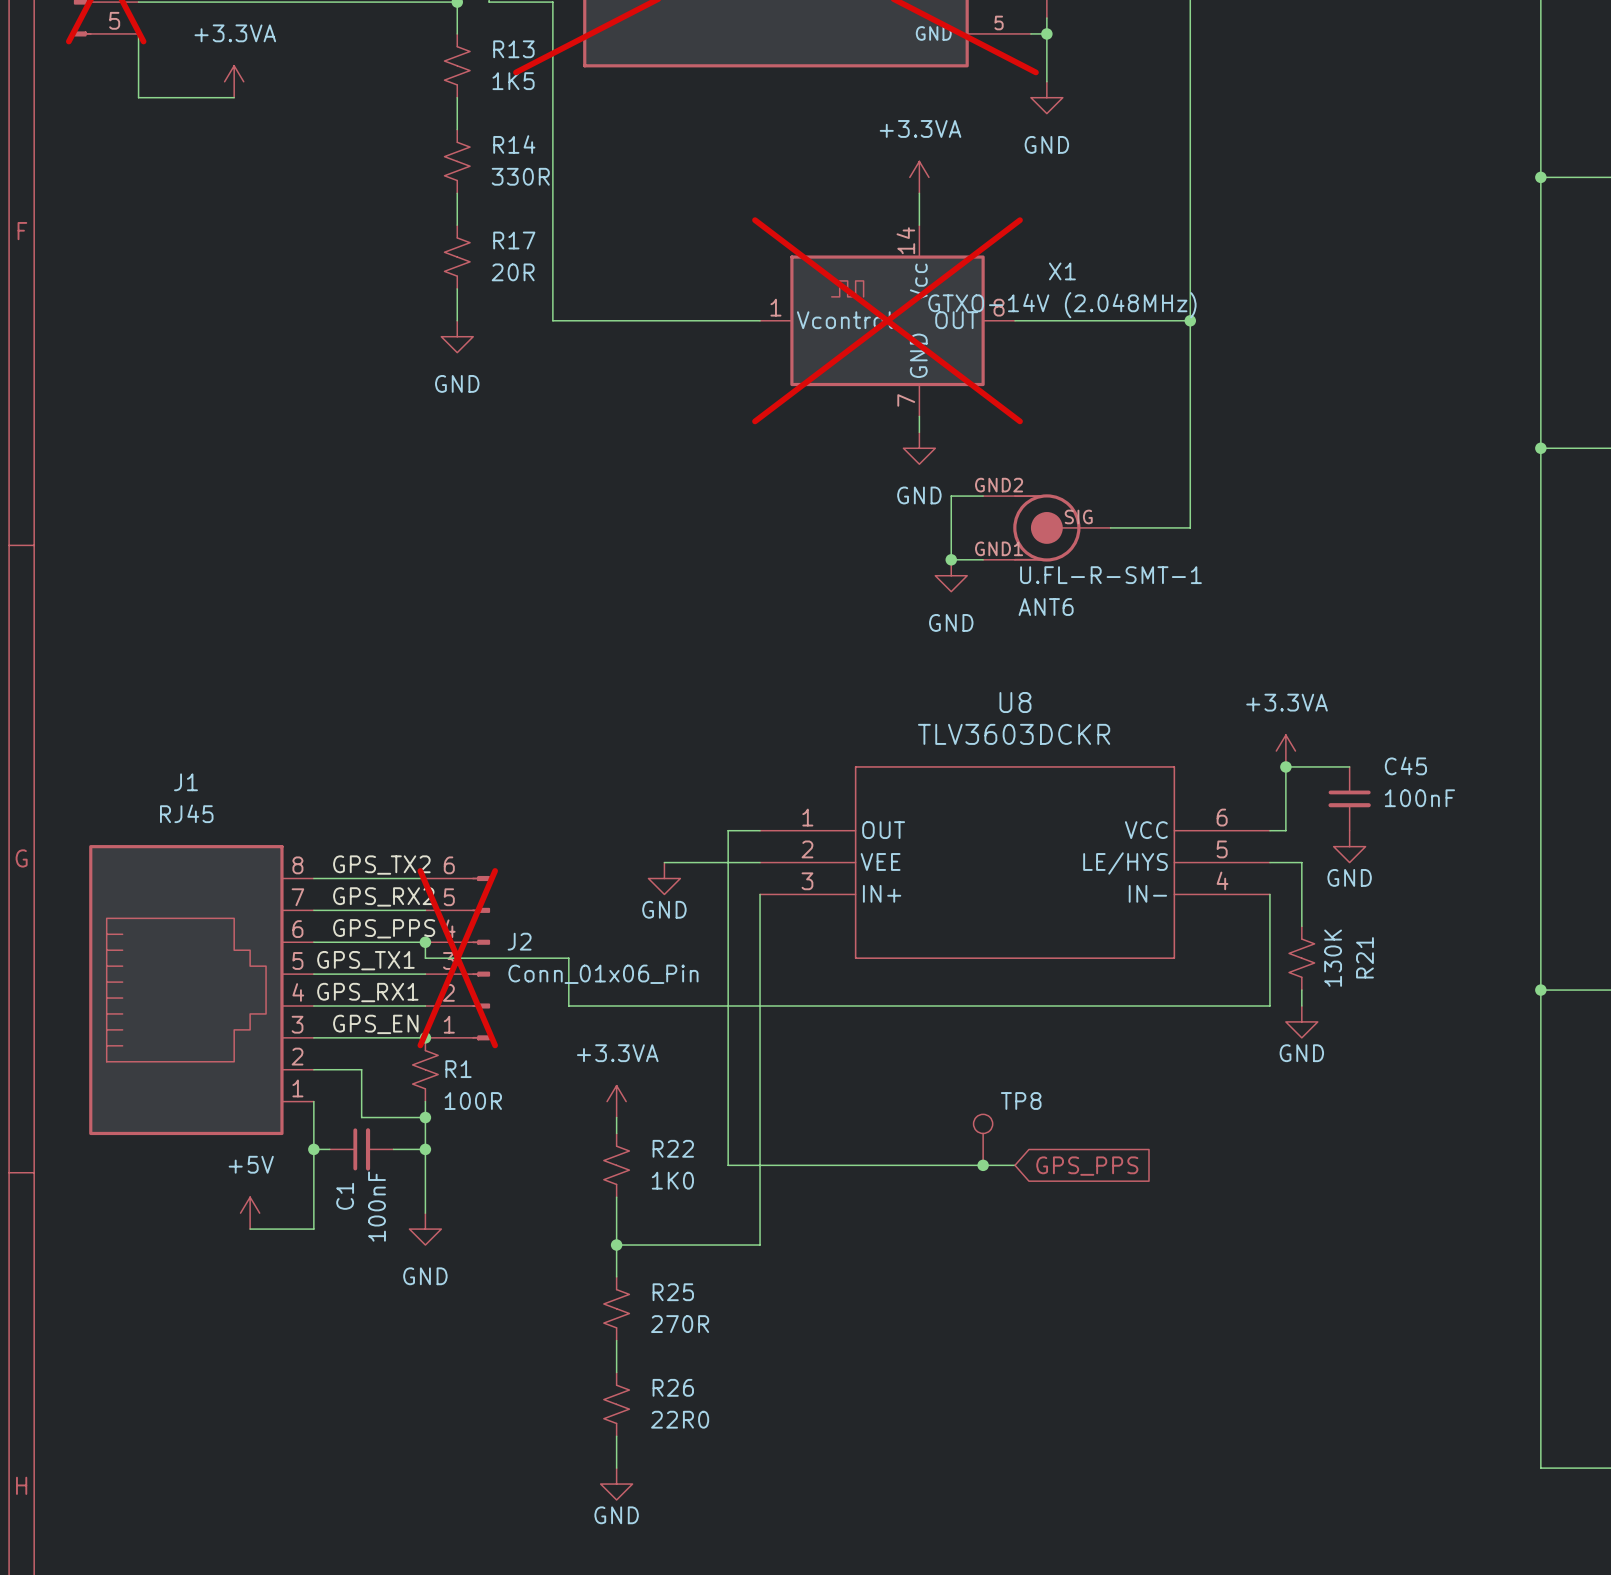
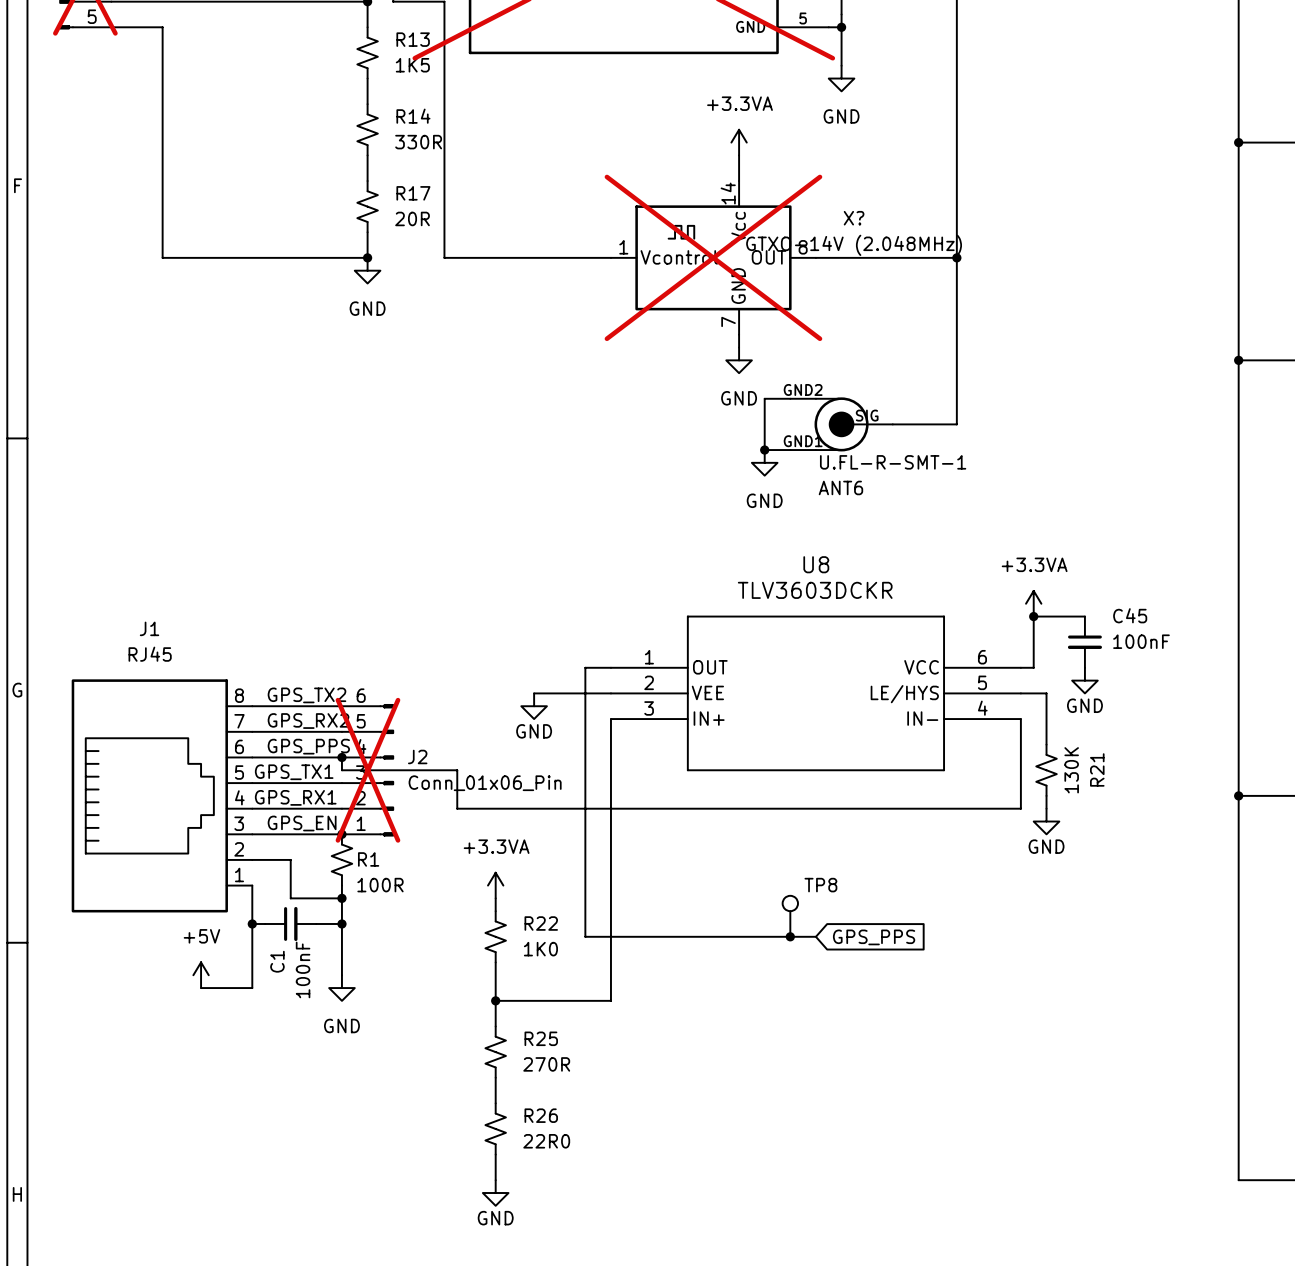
wire: (138, 33) (138, 97) (234, 97) -> (111, 27) (162, 27) (162, 257) (367, 257)
power symbol: +3.3VA (234, 81) -> none
X1 name: X1 (1062, 271) -> X? (854, 218)
junction: none -> (367, 257)

